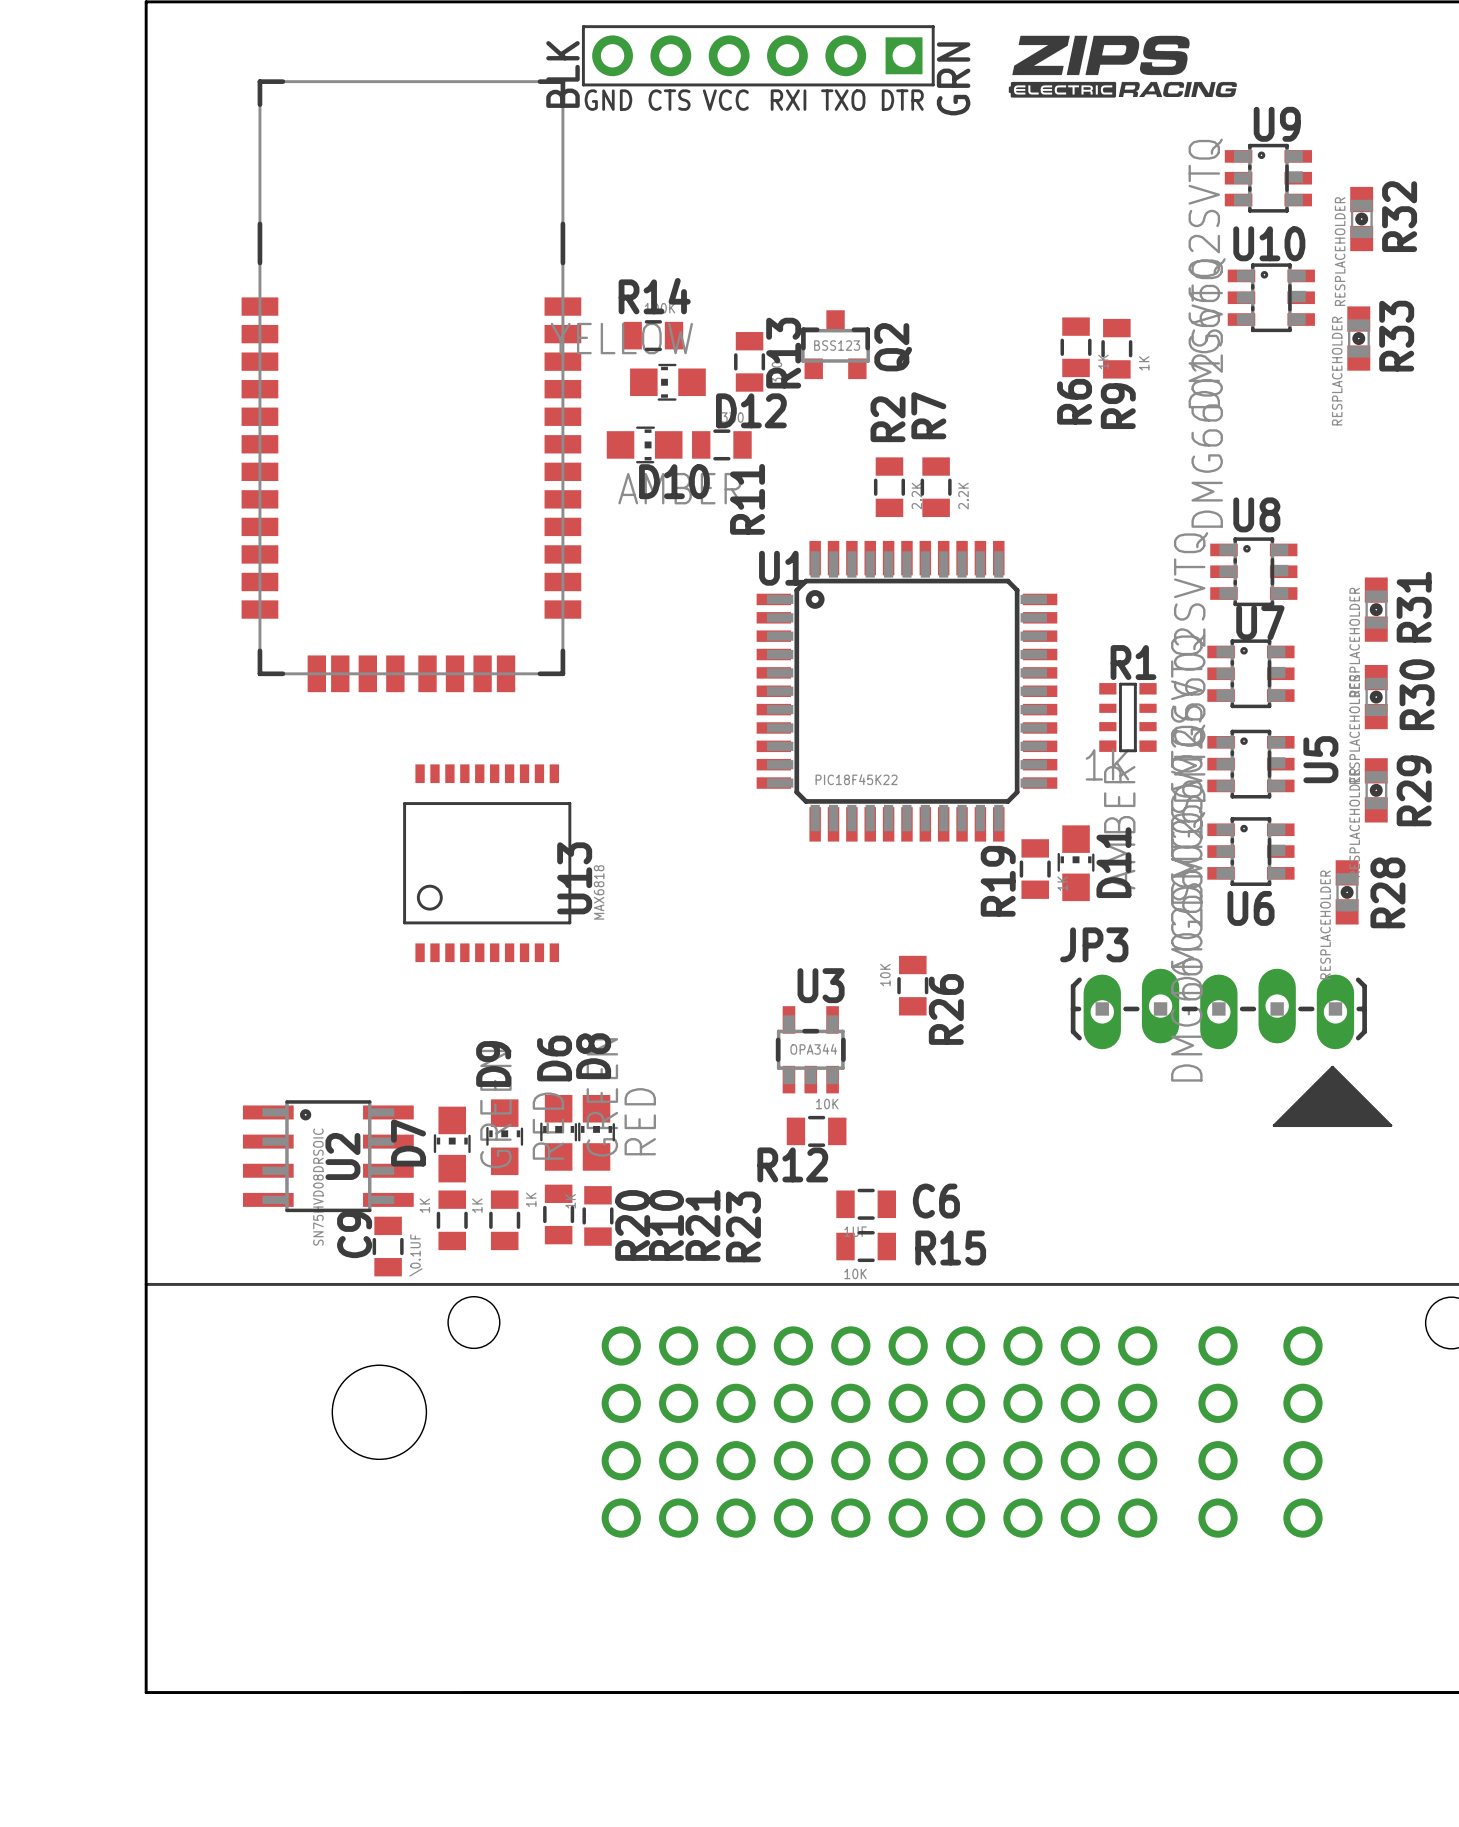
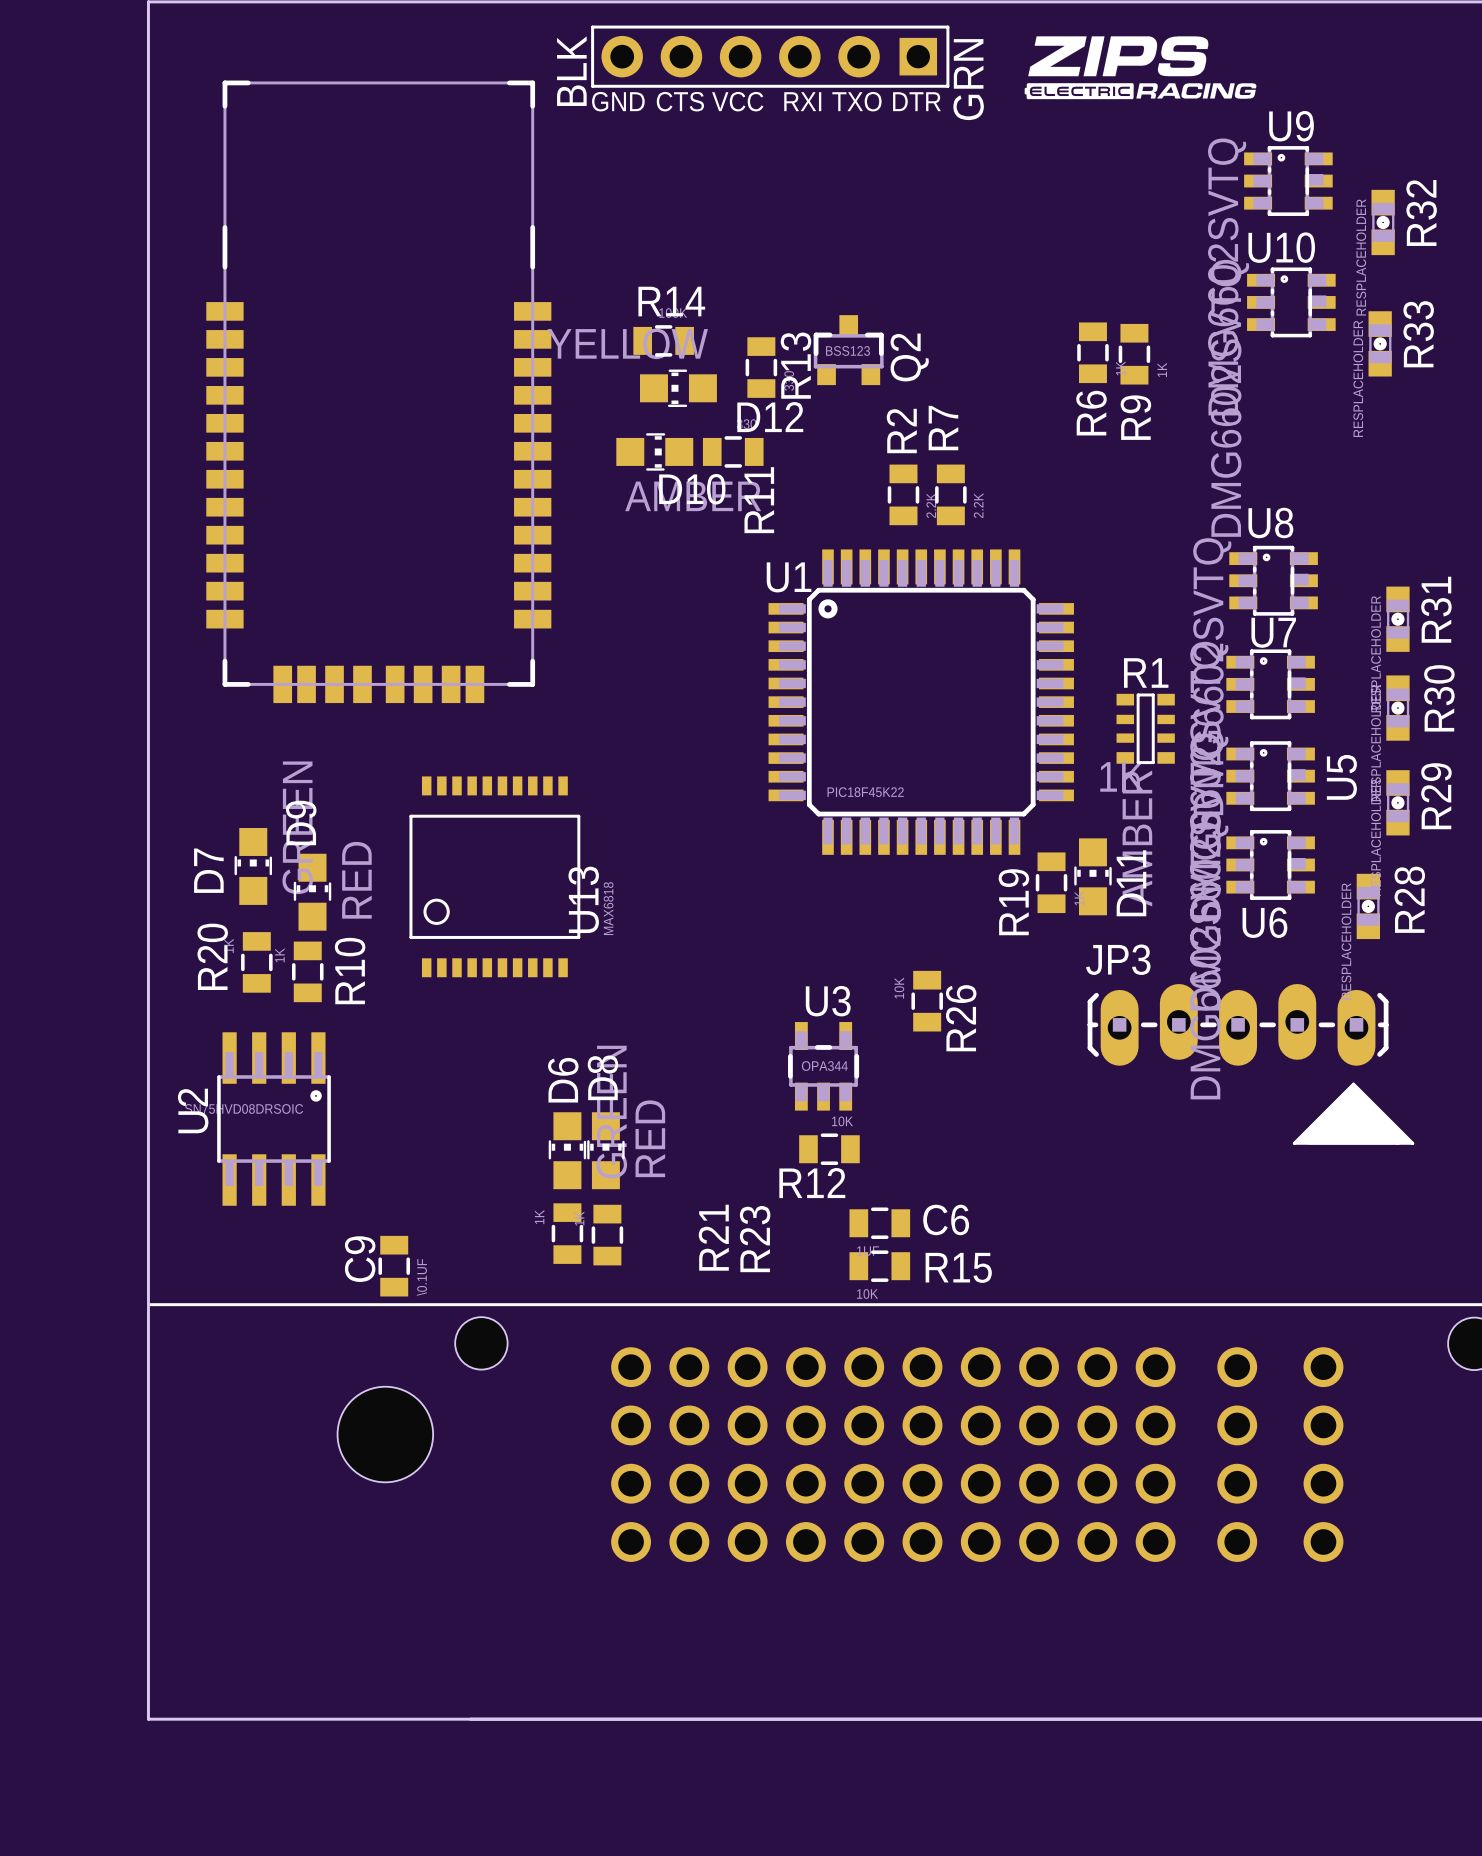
part position: (411, 385) -> (378, 391)
D9 position: (504, 1137) -> (312, 892)
D7 position: (452, 1144) -> (253, 866)
U2 rotation: 0° (328, 1156) -> 90° clockwise (274, 1119)
U2 name position: U2 (342, 1156) -> U2 (193, 1110)
R20 position: (452, 1220) -> (256, 962)
R10 position: (504, 1220) -> (307, 971)
R20 name position: R20 (632, 1225) -> R20 (212, 956)
R10 name position: R10 (666, 1225) -> R10 (350, 971)

